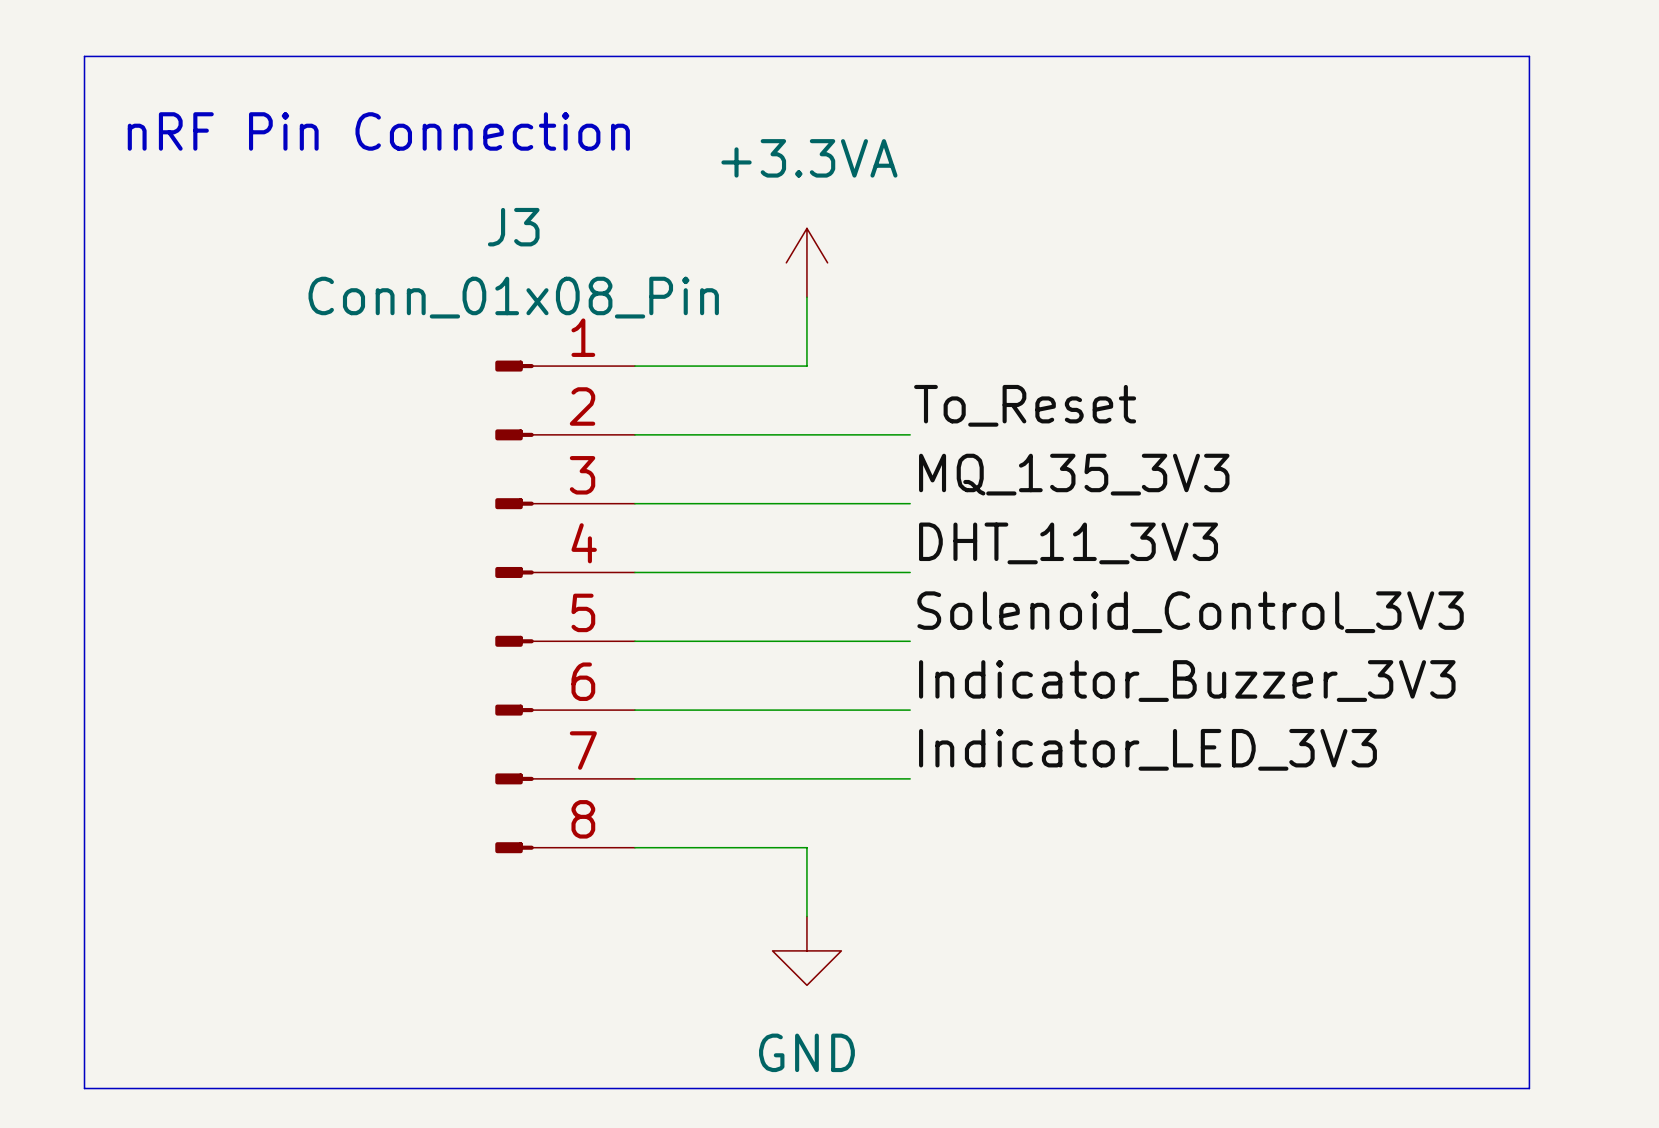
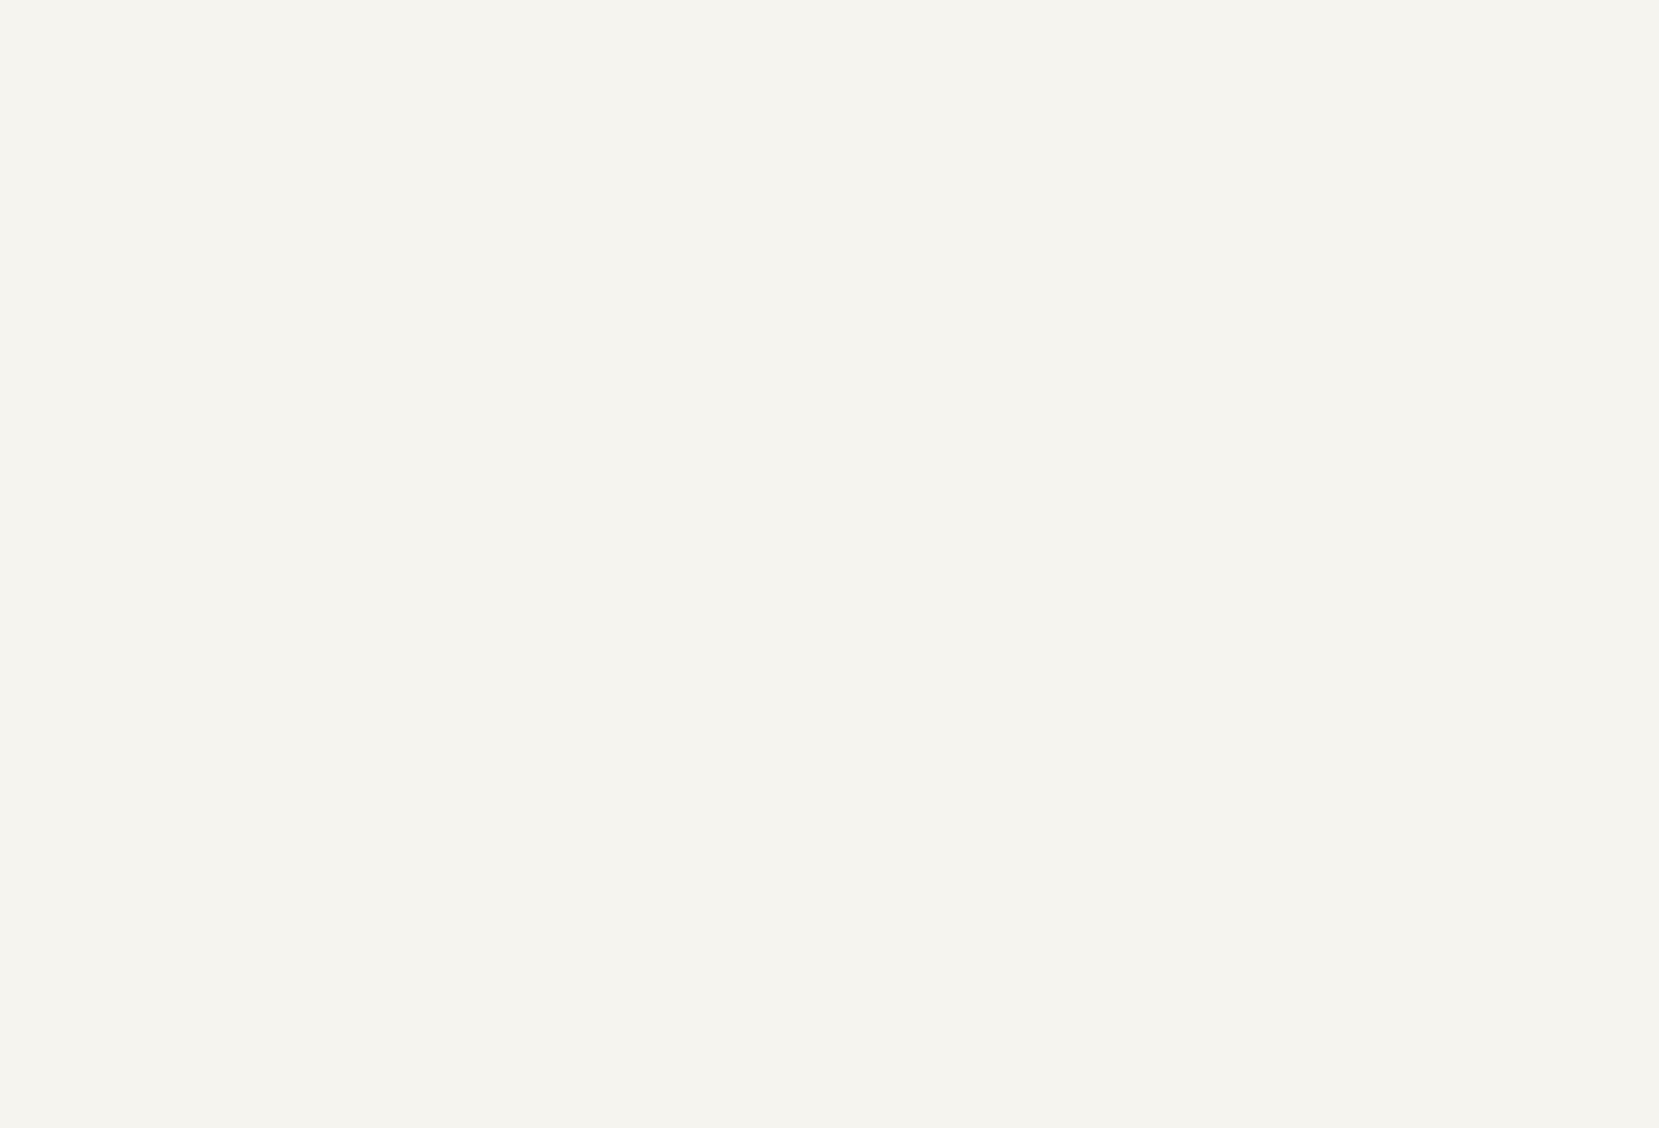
line: (84, 56) (1529, 56) (1529, 1088) (84, 1088) (84, 56) -> none
text: nRF Pin Connection (378, 131) -> none
power symbol: +3.3VA (806, 262) -> none
wire: (806, 297) (806, 366) (634, 366) -> none
label: To_Reset (1025, 405) -> none
wire: (634, 434) (910, 434) -> none
label: MQ_135_3V3 (1074, 474) -> none
wire: (634, 503) (910, 503) -> none
label: DHT_11_3V3 (1068, 543) -> none
wire: (634, 572) (910, 572) -> none
J3: Conn_01x08_Pin (565, 606) -> none
label: Solenoid_Control_3V3 (1190, 612) -> none
wire: (634, 641) (910, 641) -> none
label: Indicator_Buzzer_3V3 (1187, 681) -> none
wire: (634, 710) (910, 710) -> none
label: Indicator_LED_3V3 (1147, 749) -> none
wire: (634, 778) (910, 778) -> none
wire: (634, 847) (806, 847) (806, 916) -> none
power symbol: GND (806, 950) -> none

